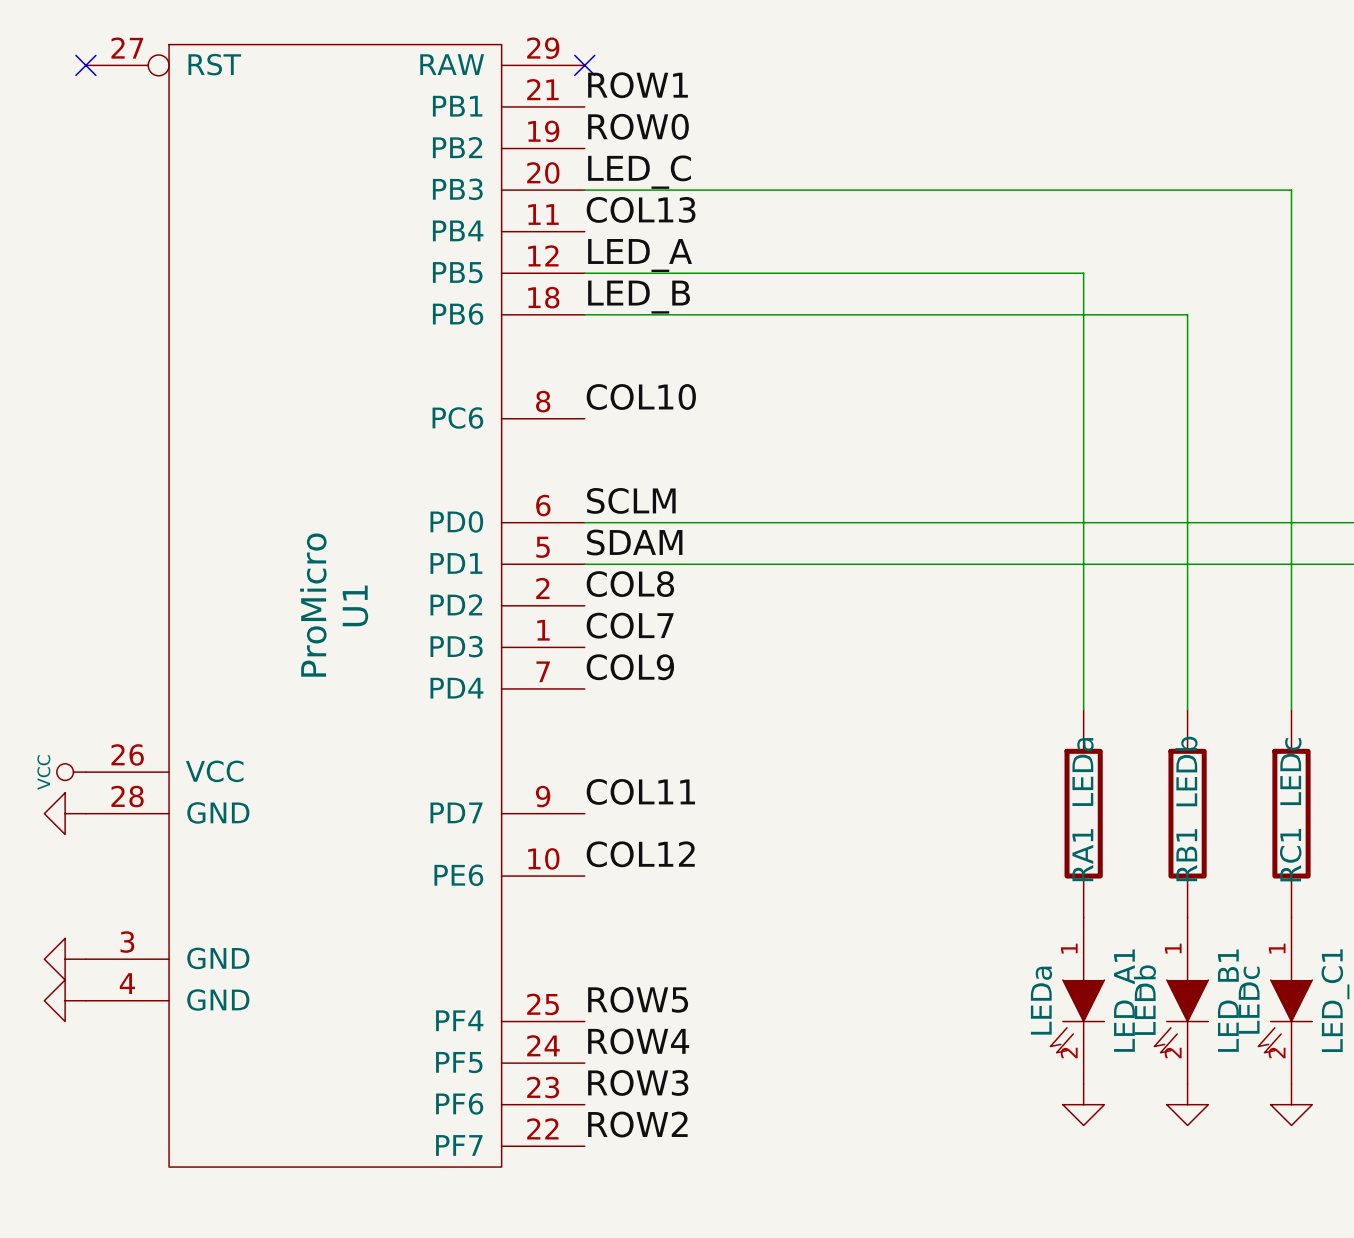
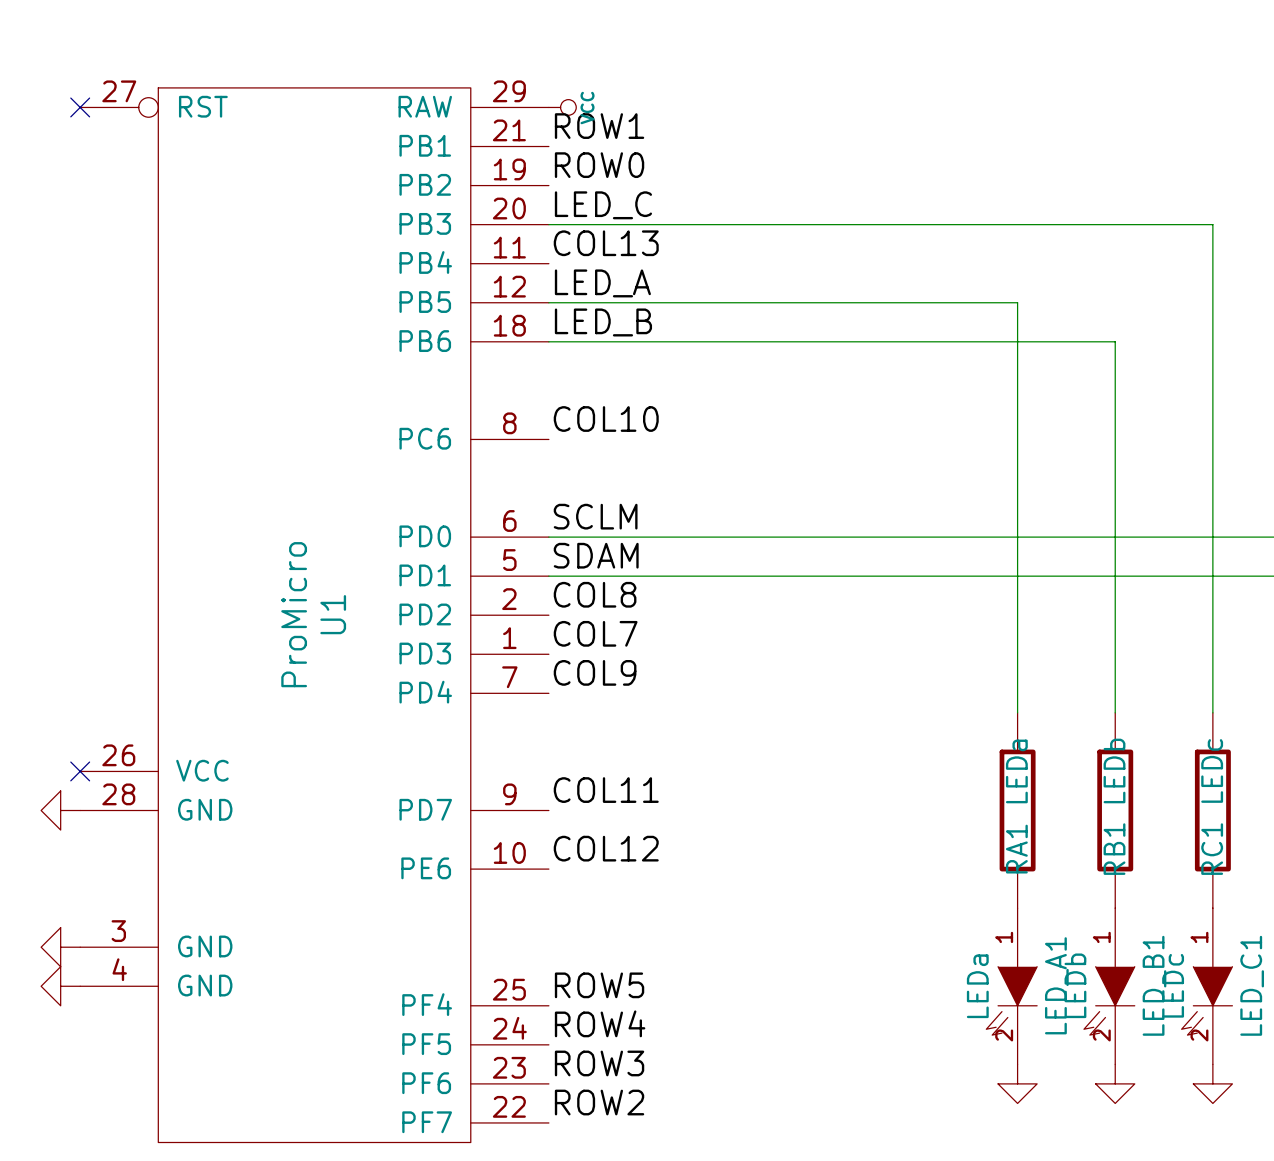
no-connect mark: (584, 65) -> none
power symbol: none -> VCC (562, 107)
power symbol: VCC (71, 772) -> none
no-connect mark: none -> (80, 771)

